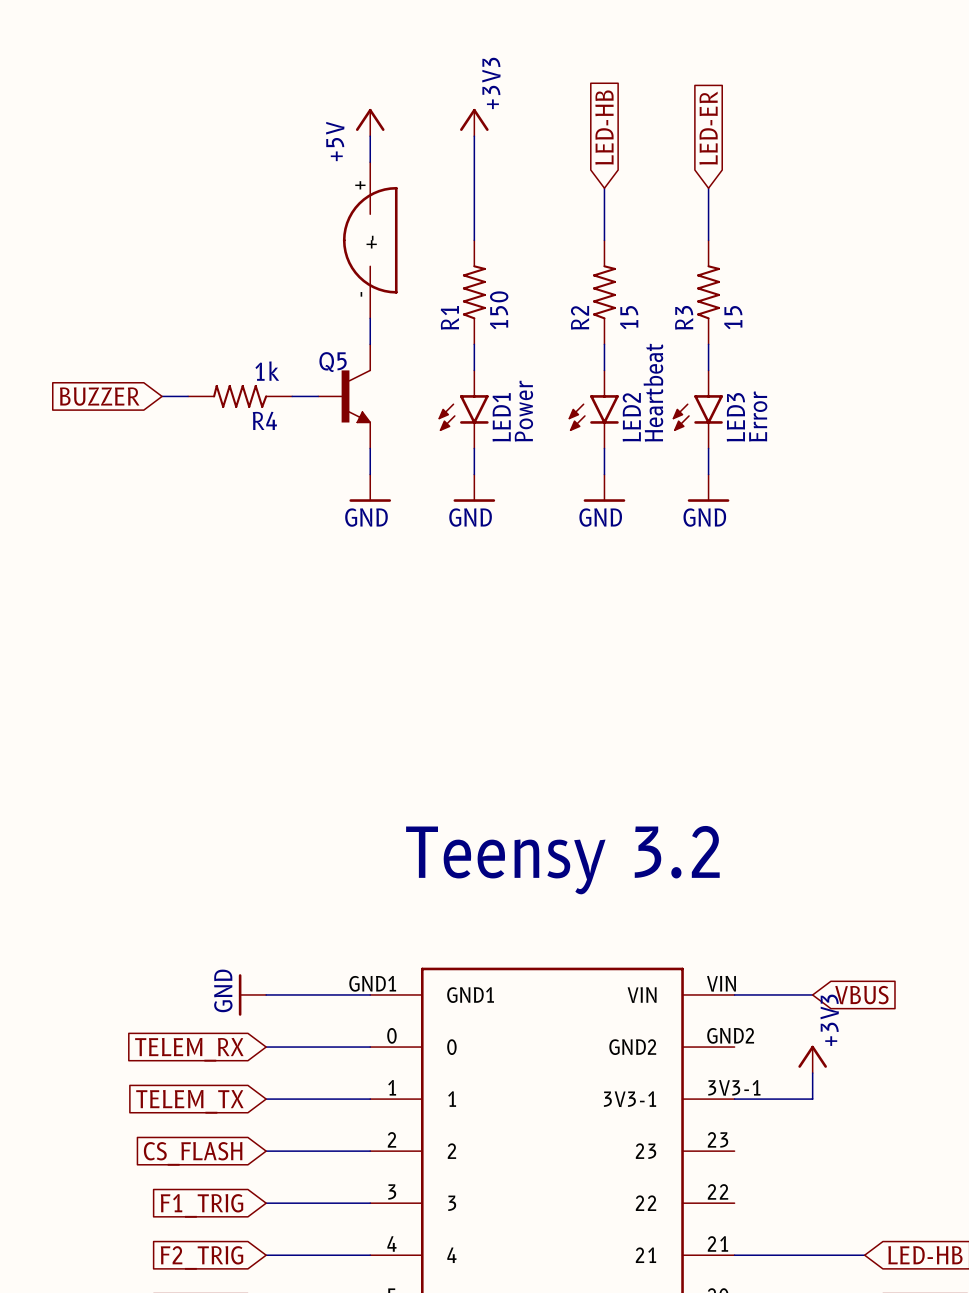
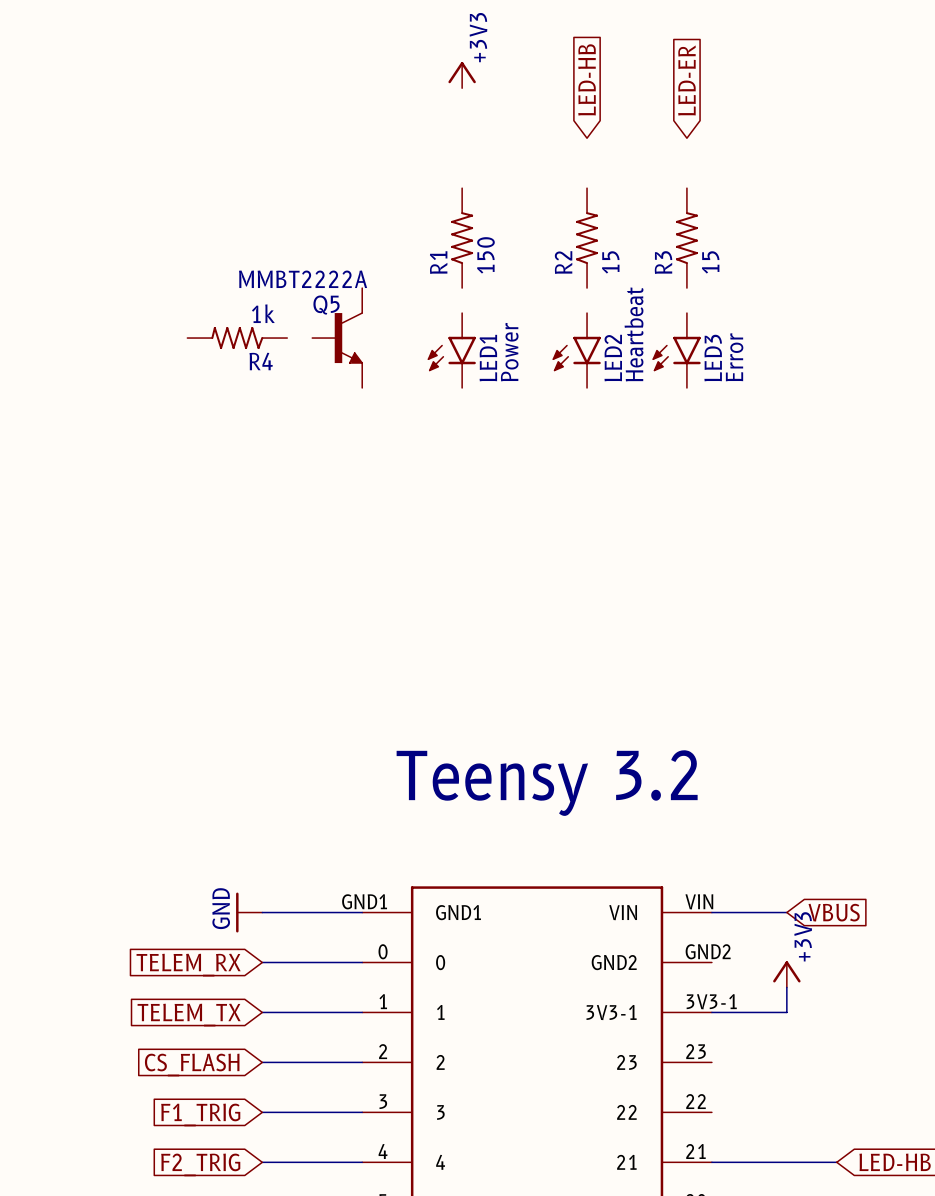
power symbol: +5V (370, 122) -> none
wire: (370, 136) (370, 162) -> none
wire: (474, 136) (474, 240) -> none
wire: (604, 188) (604, 240) -> none
wire: (708, 188) (708, 240) -> none
part: (370, 240) -> none
wire: (370, 318) (370, 344) -> none
Q5 value: none -> MMBT2222A (303, 279)
wire: (474, 344) (474, 370) -> none
wire: (604, 344) (604, 370) -> none
wire: (708, 344) (708, 370) -> none
global label: BUZZER (99, 396) -> none
wire: (162, 396) (188, 396) -> none
wire: (292, 396) (318, 396) -> none
wire: (370, 448) (370, 474) -> none
wire: (474, 448) (474, 474) -> none
wire: (604, 448) (604, 474) -> none
wire: (708, 448) (708, 474) -> none
power symbol: GND (370, 488) -> none
power symbol: GND (474, 488) -> none
power symbol: GND (604, 488) -> none
power symbol: GND (708, 488) -> none

